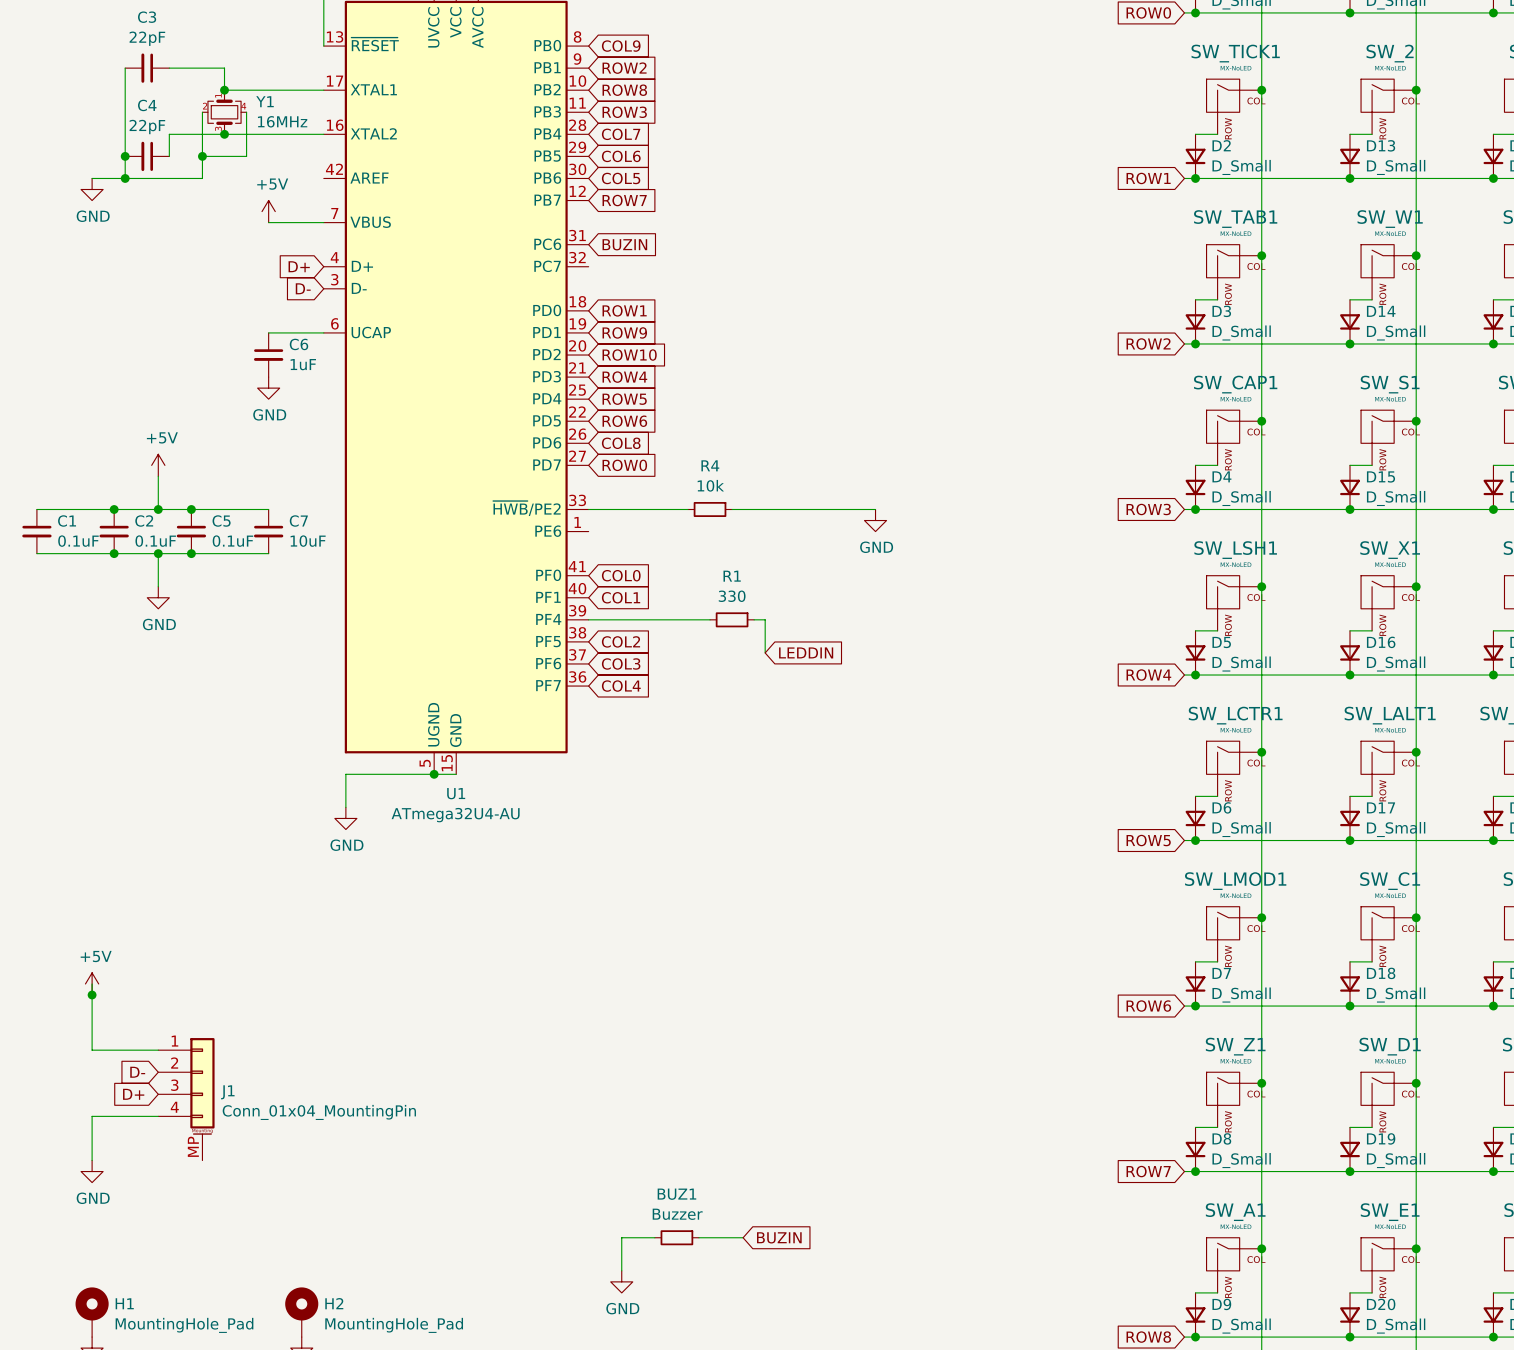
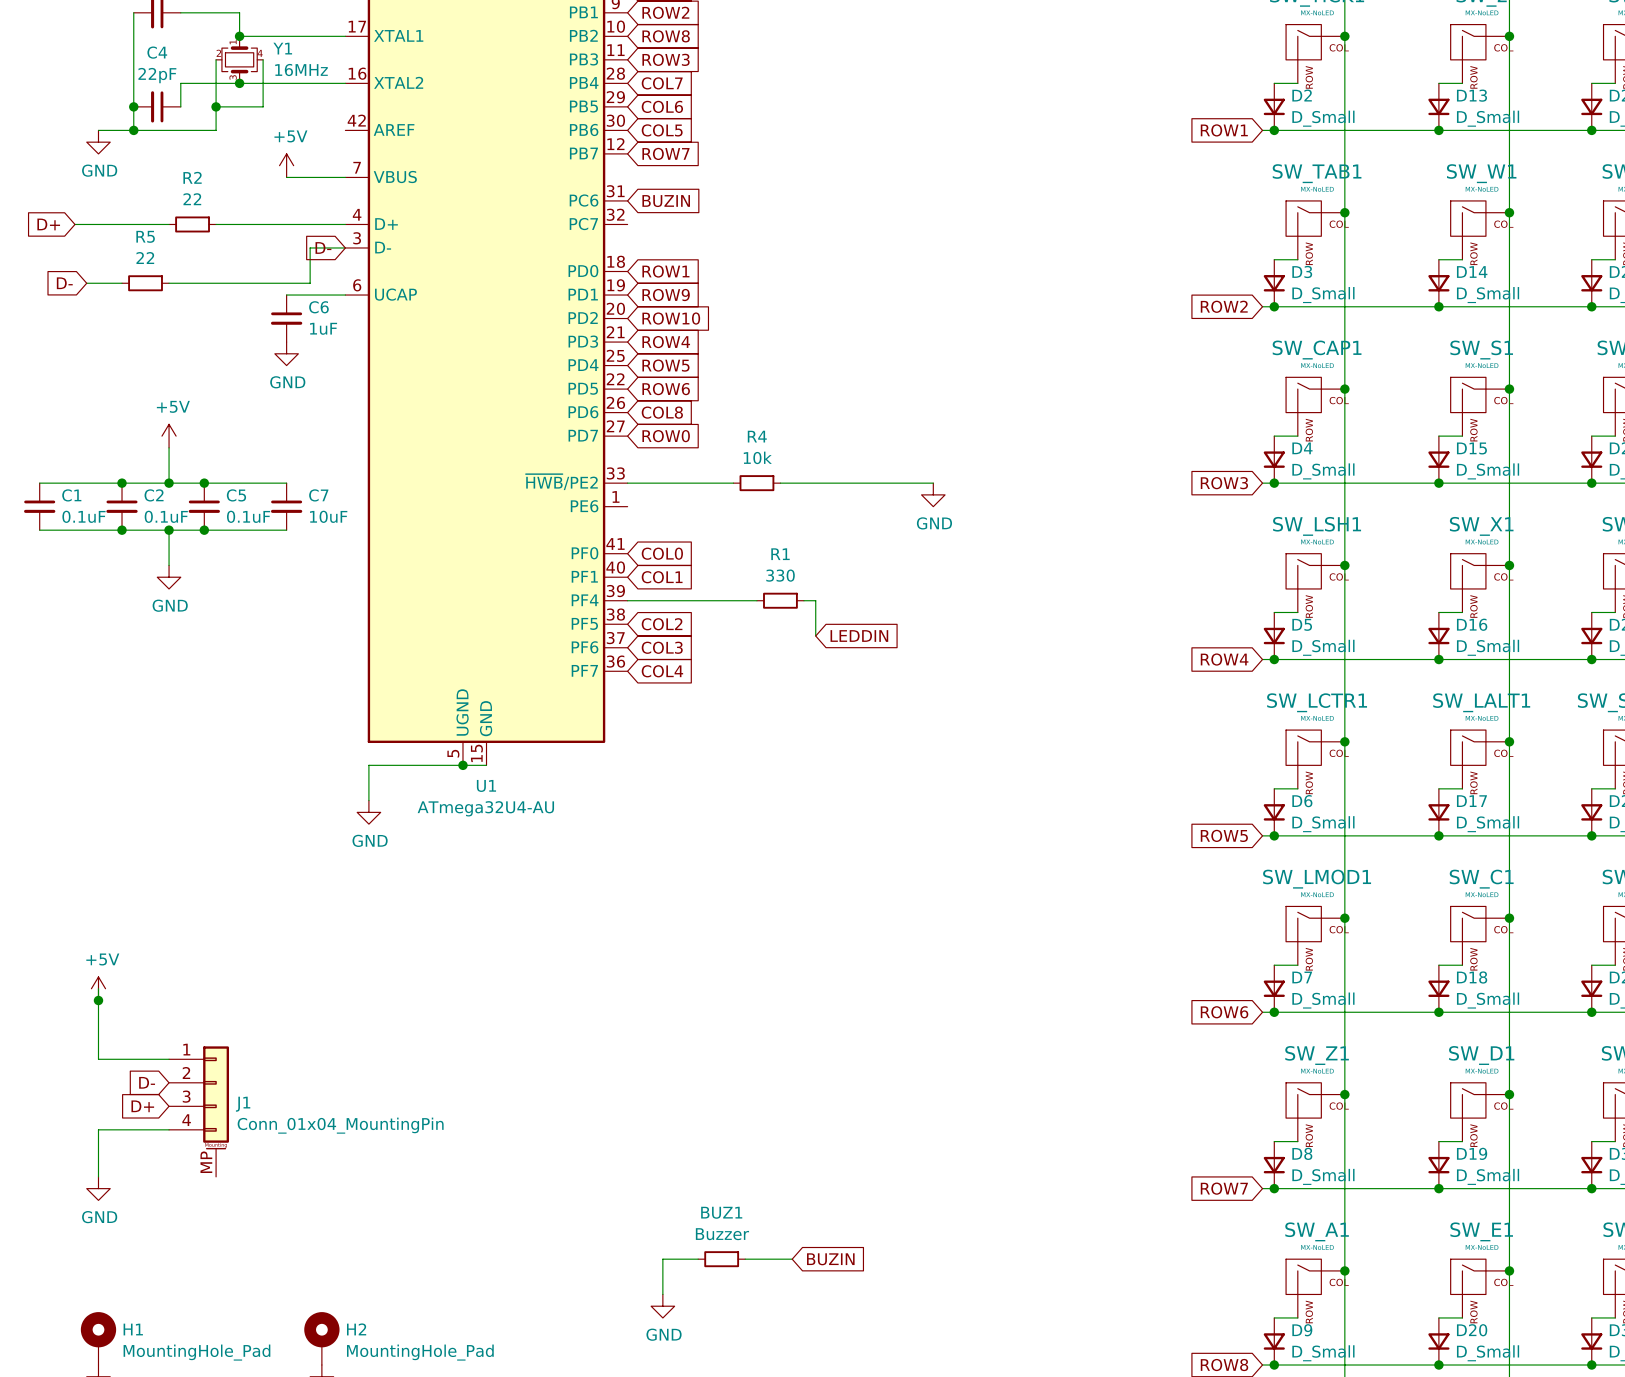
global label: none -> D+ (48, 224)
wire: none -> (74, 224) (169, 224)
R2: none -> 22 (192, 224)
wire: none -> (216, 224) (345, 224)
global label: D+ (299, 266) -> none
wire: none -> (345, 247) (310, 247) (310, 283) (169, 283)
global label: none -> D- (64, 283)
wire: none -> (86, 283) (122, 283)
R5: none -> 22 (145, 283)

